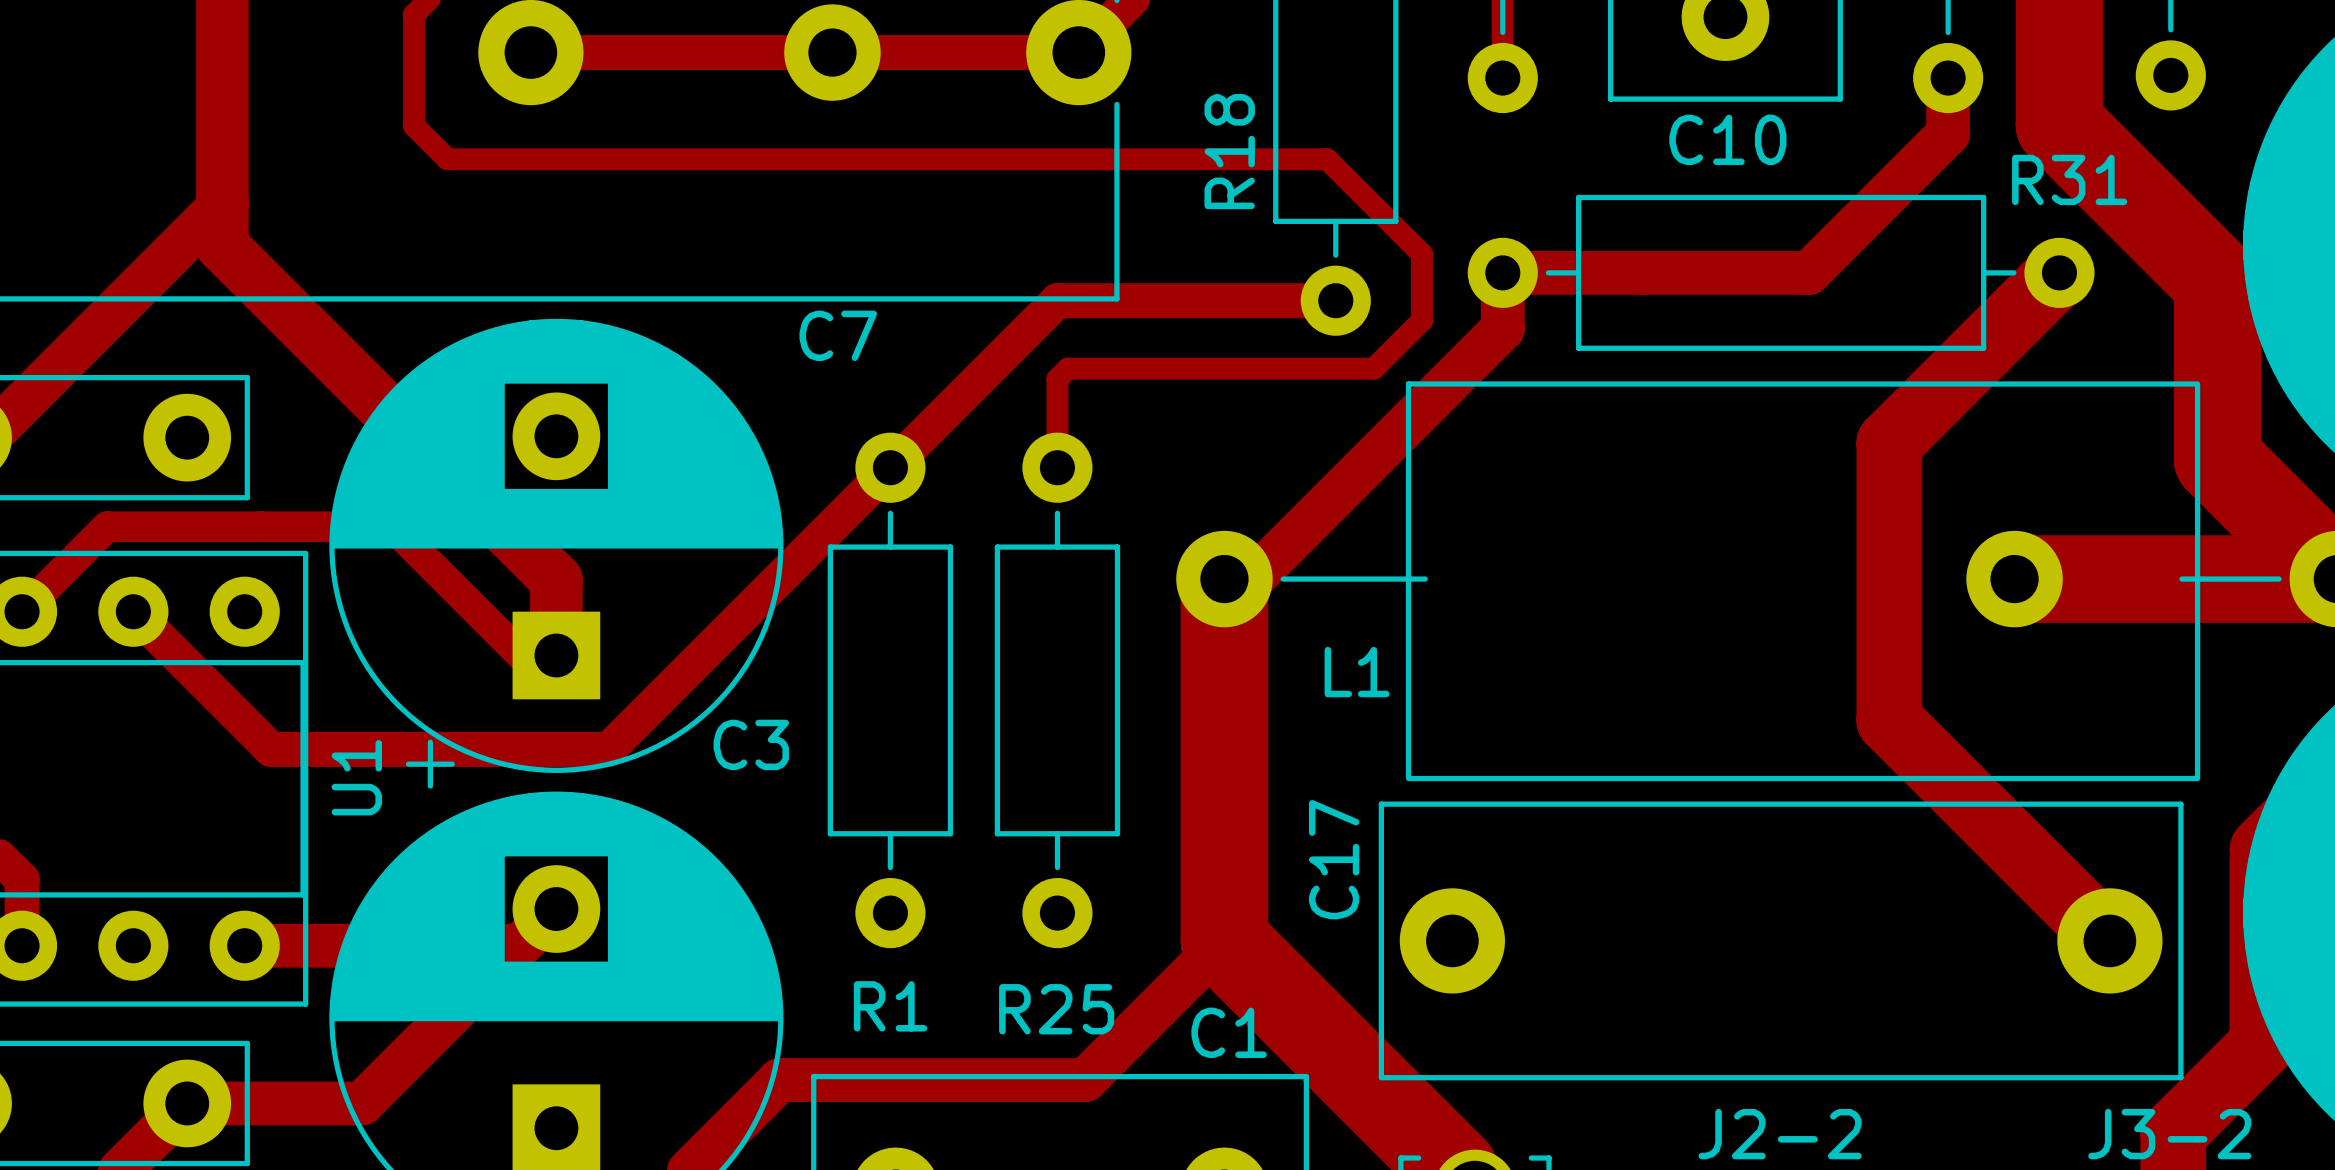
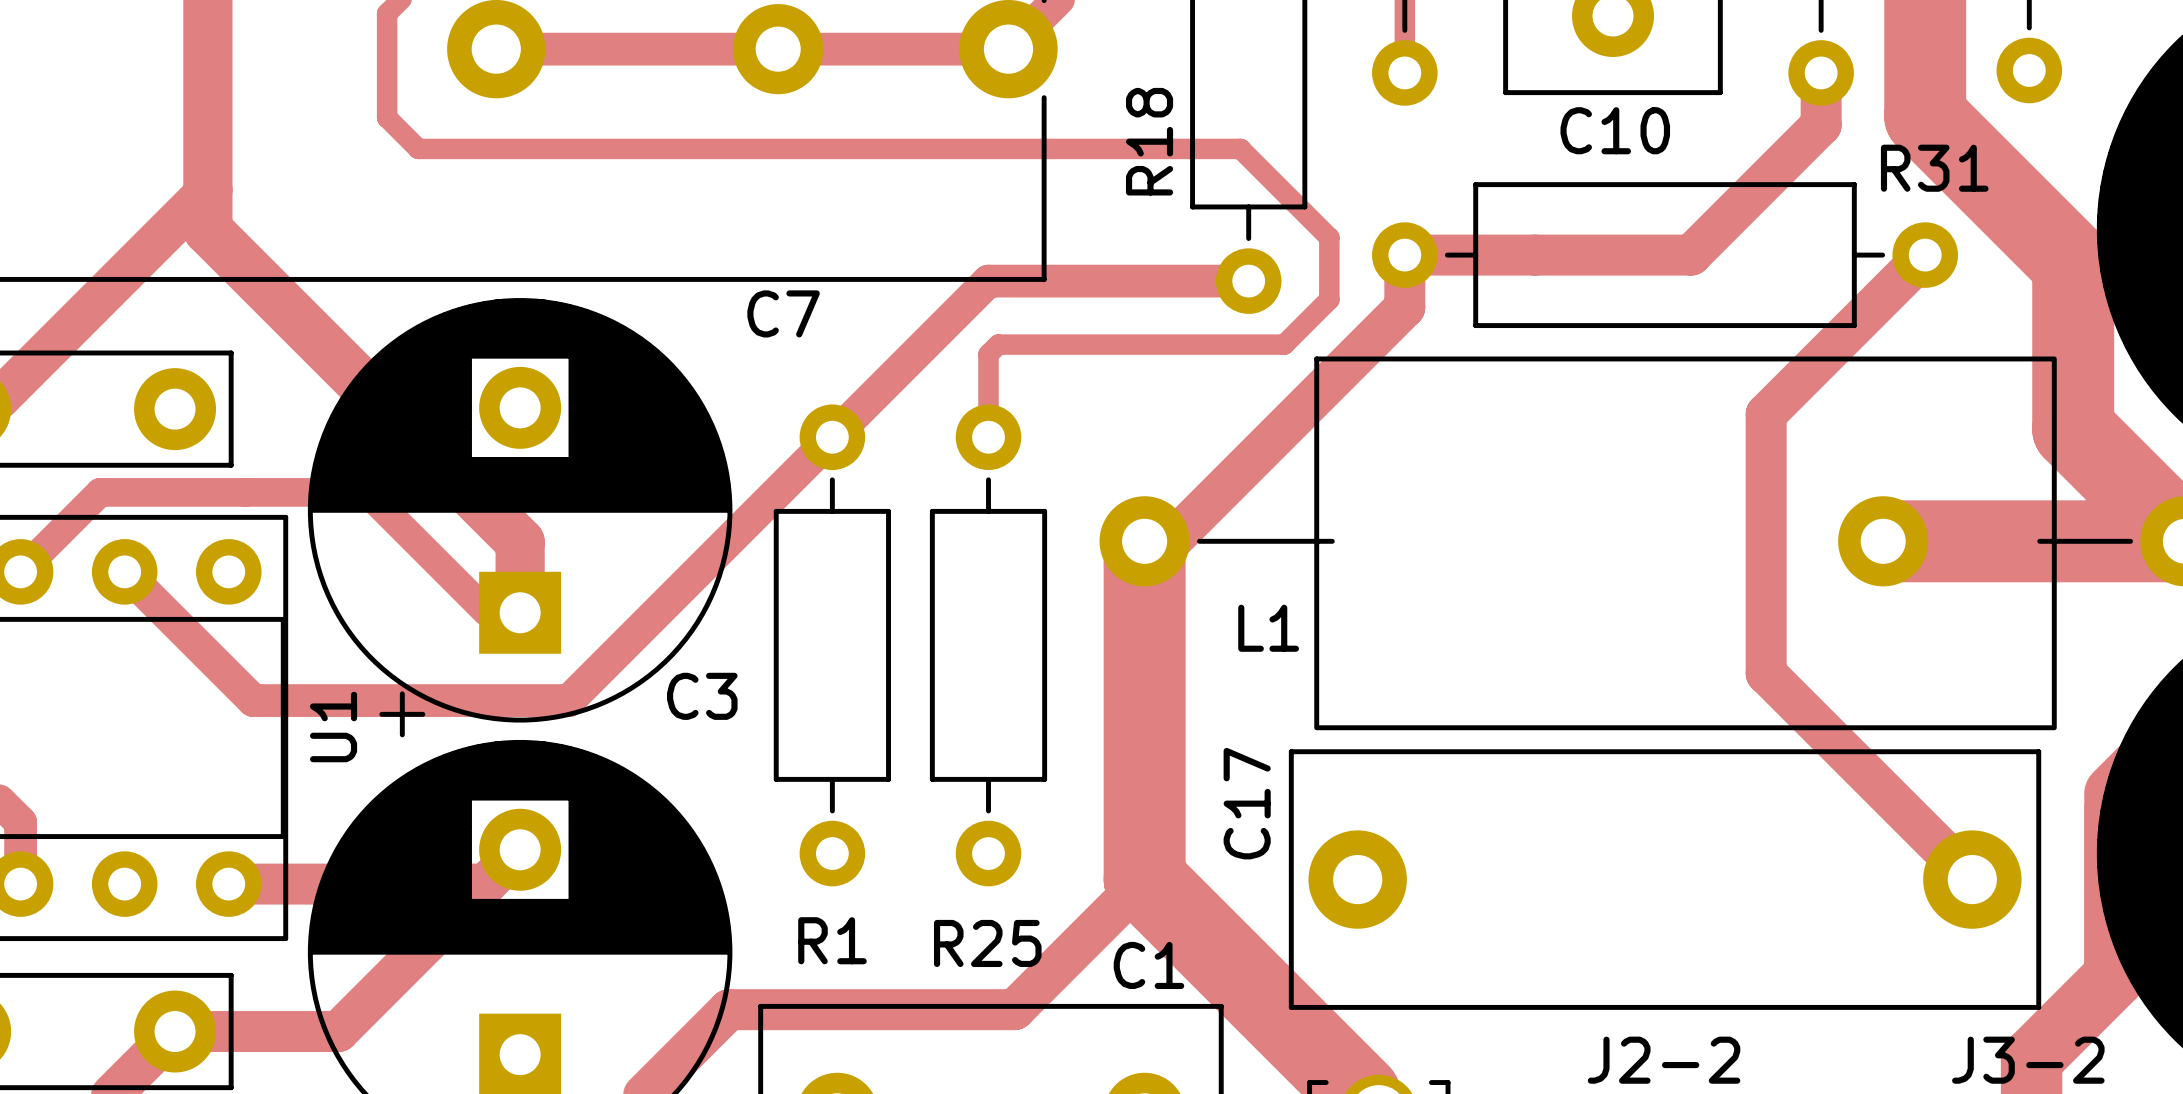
track width: thick (2059, 272) (1889, 443) (1889, 720) (2109, 940) -> thin (1925, 255) (1766, 414) (1766, 673) (1972, 879)

